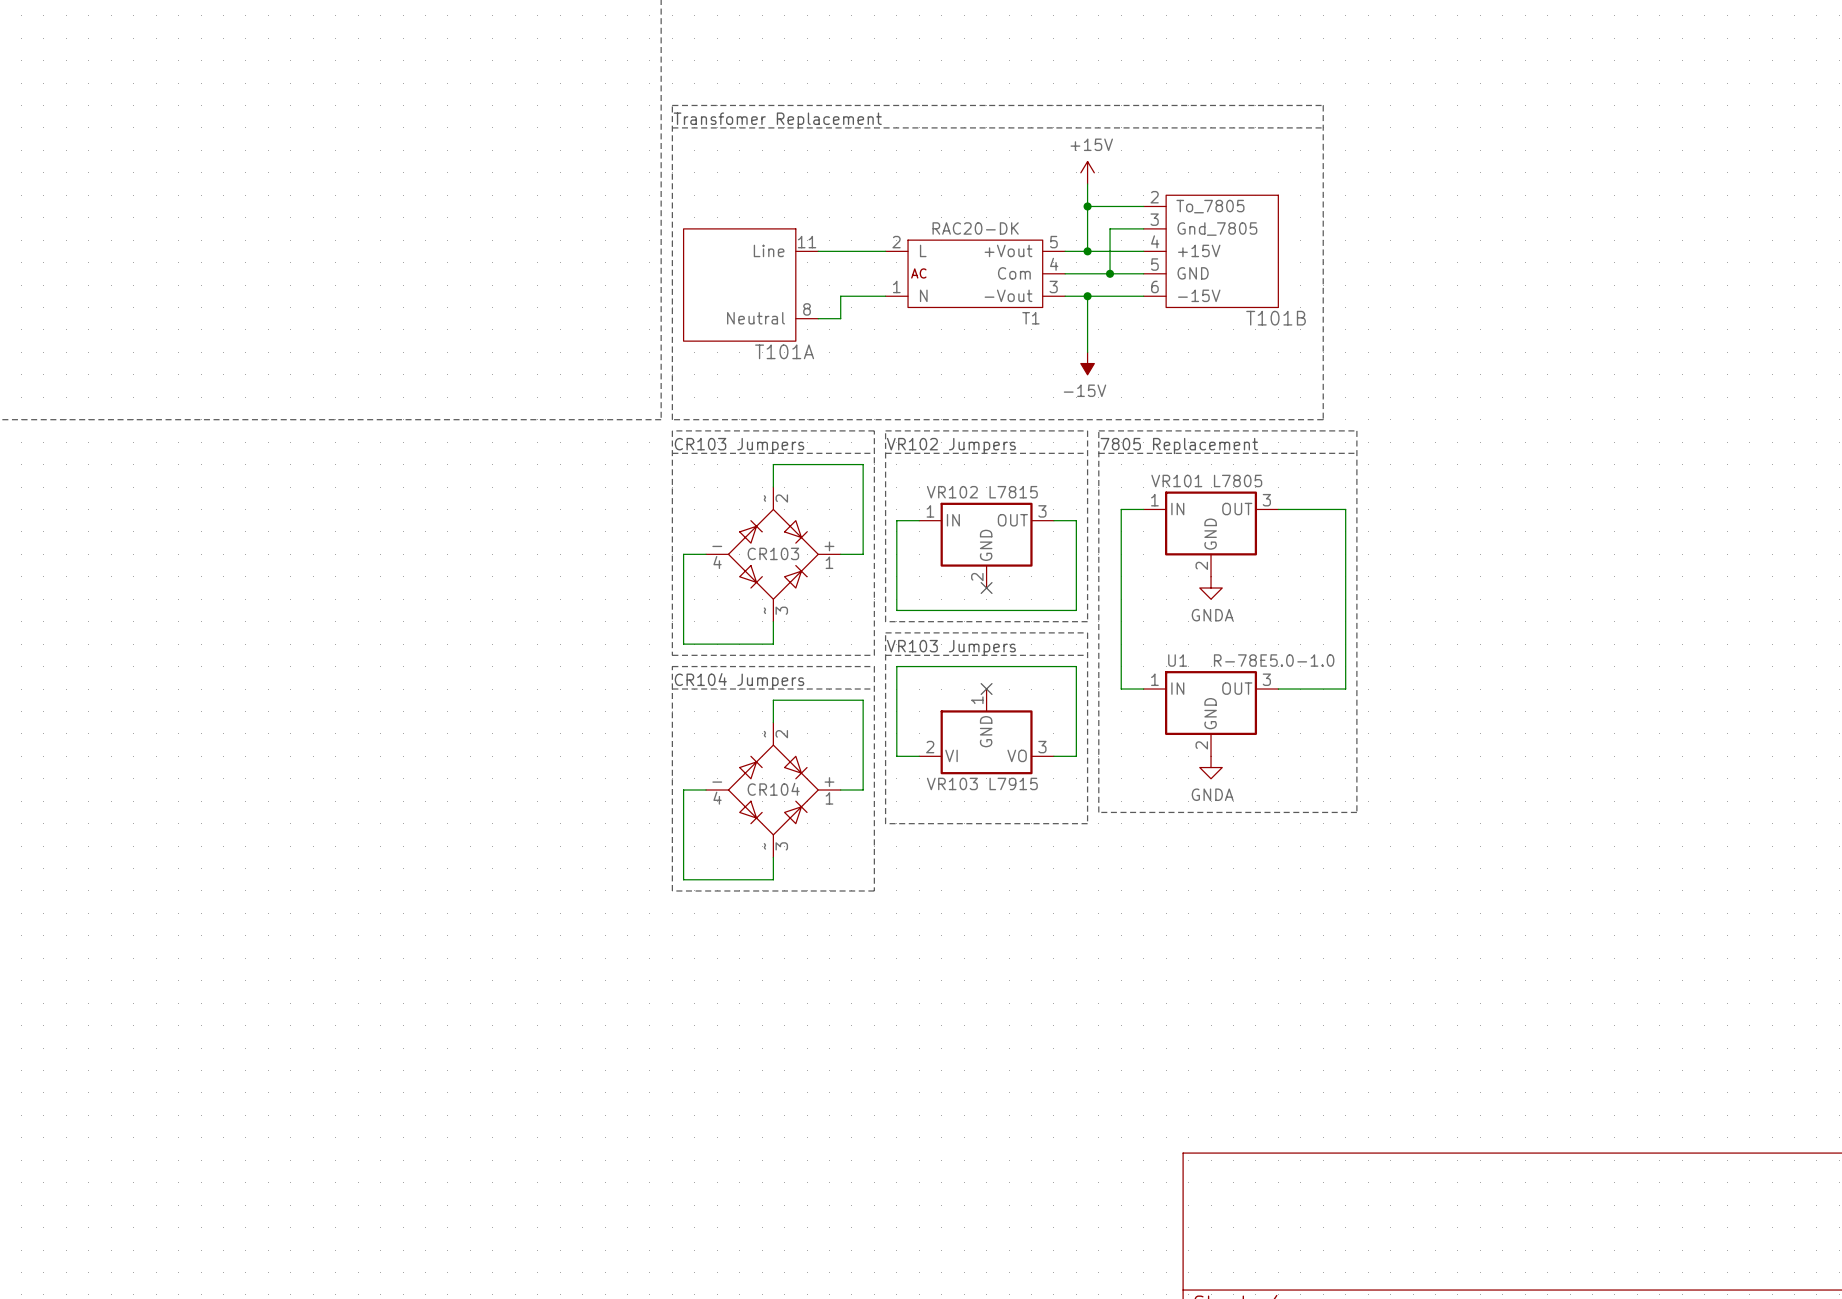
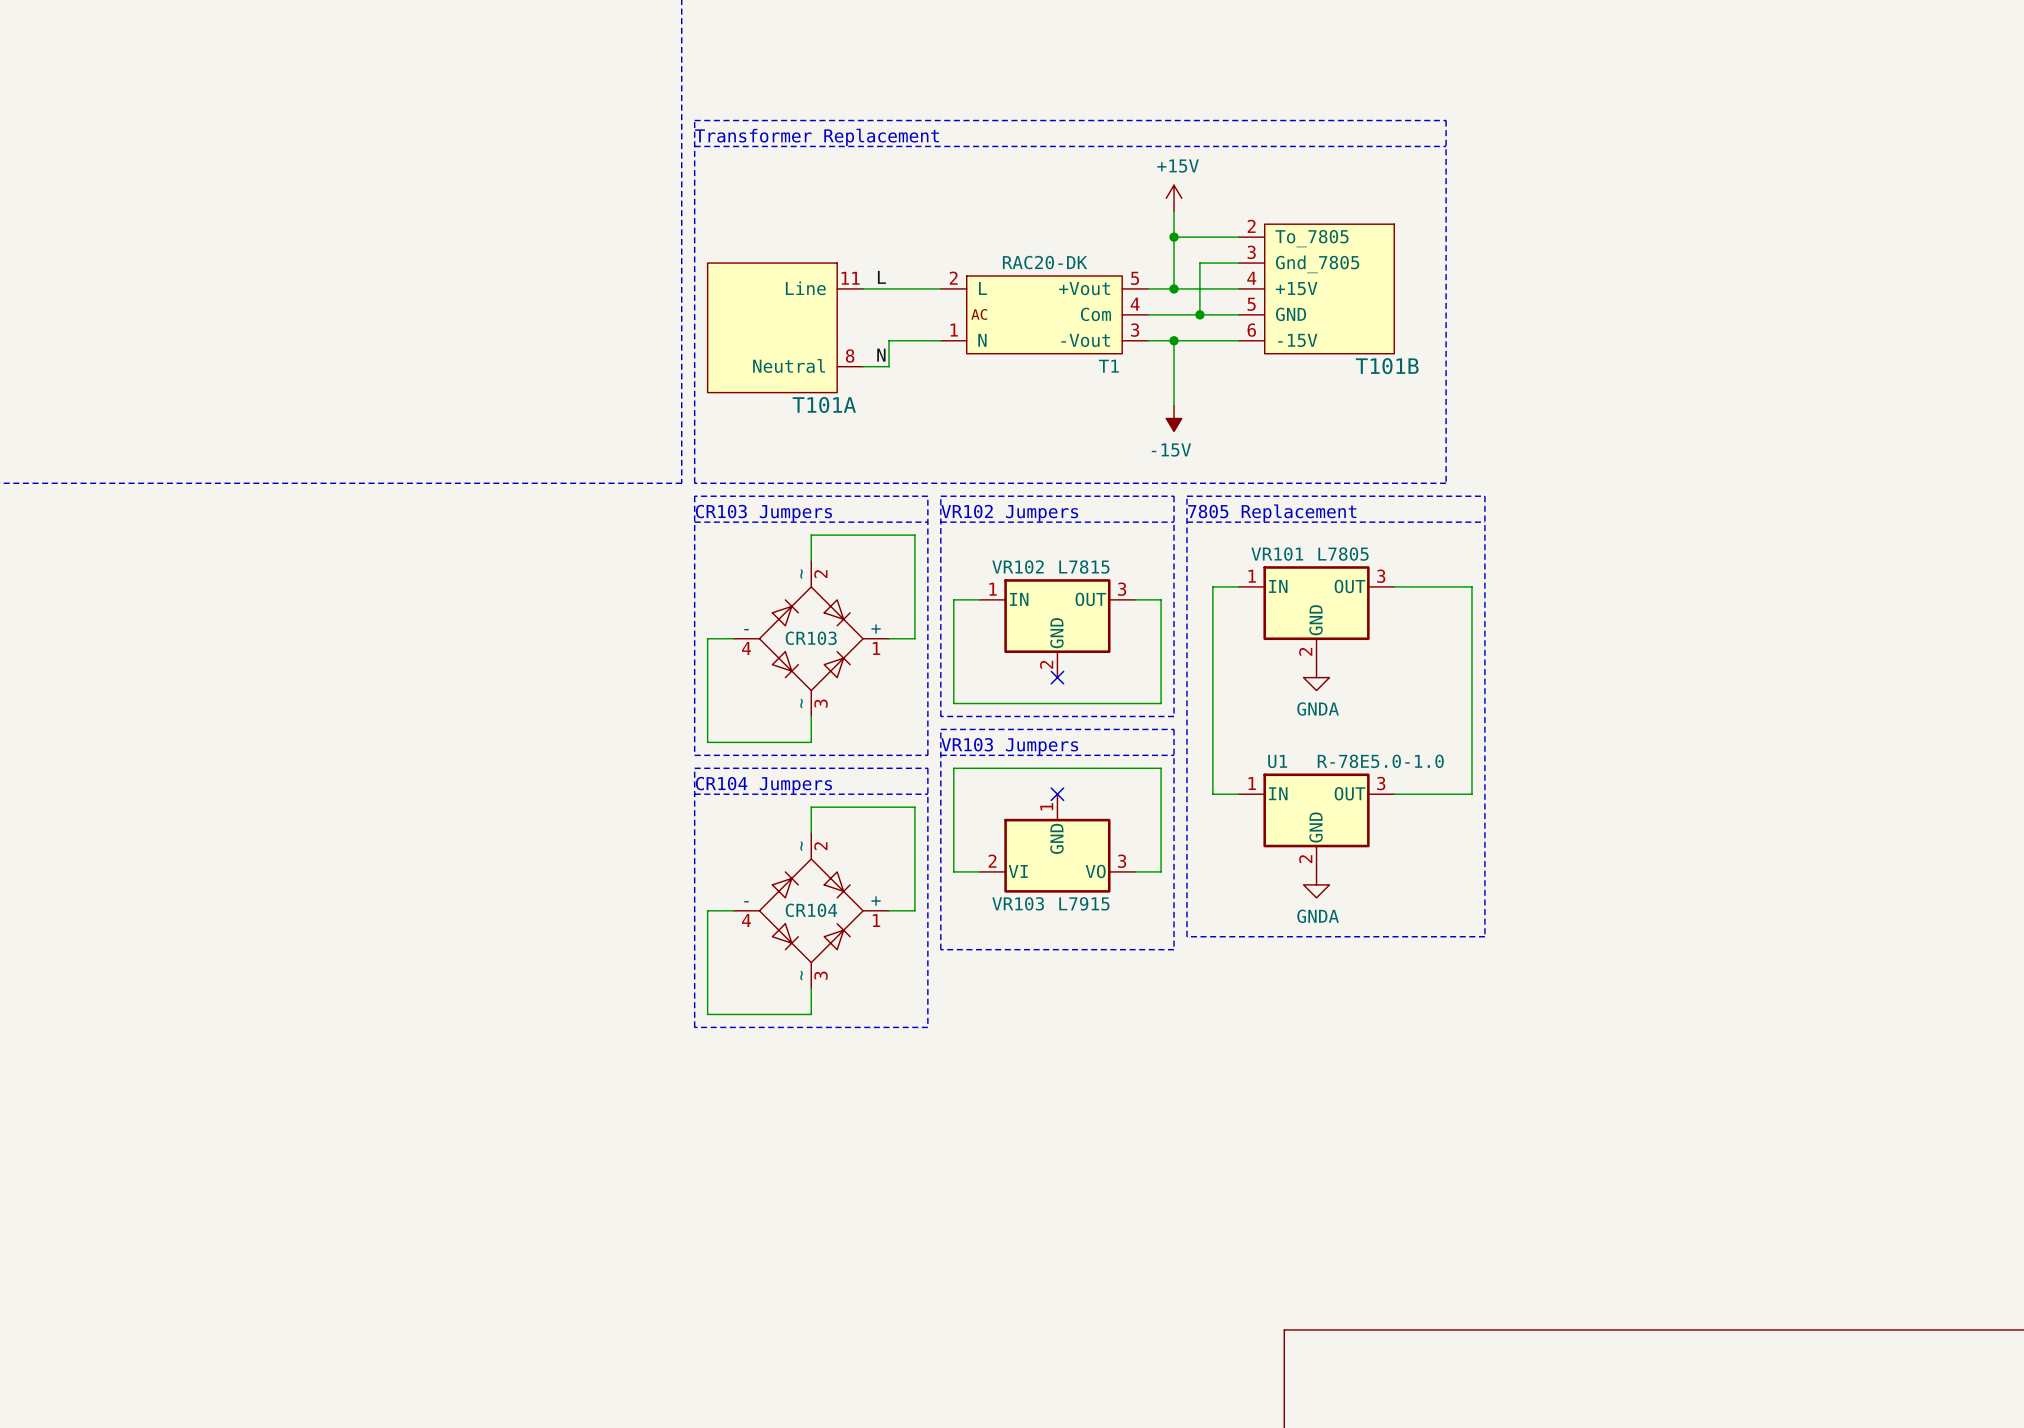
text: Transfomer Replacement (777, 120) -> Transformer Replacement (817, 137)
label: none -> L (881, 277)
label: none -> N (881, 355)

